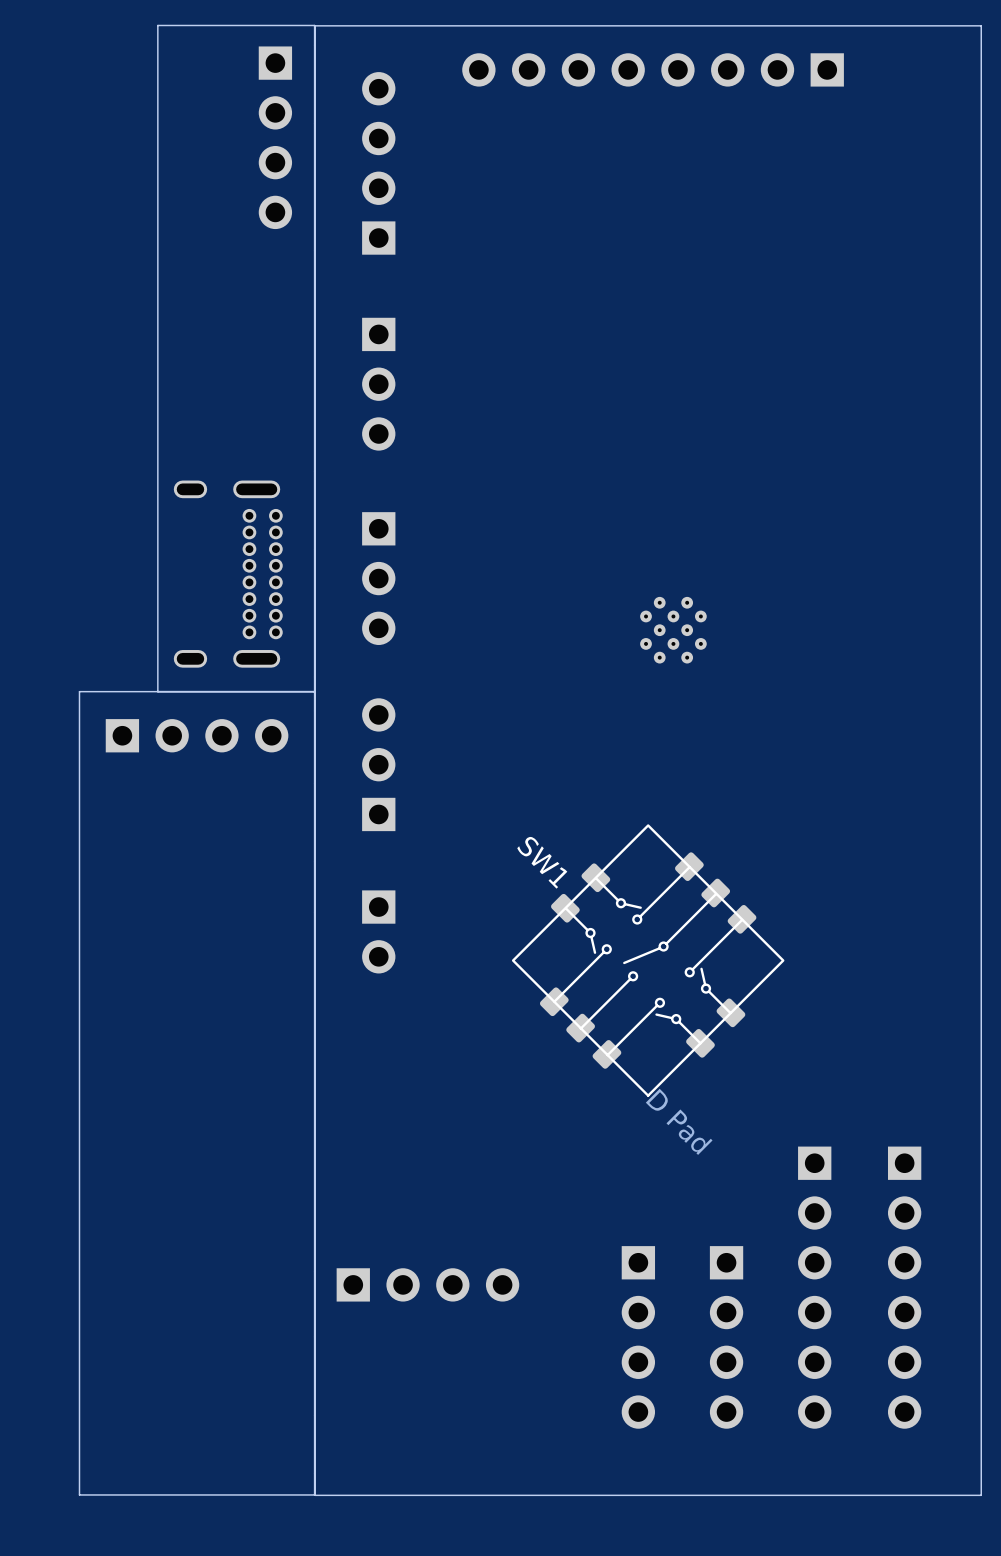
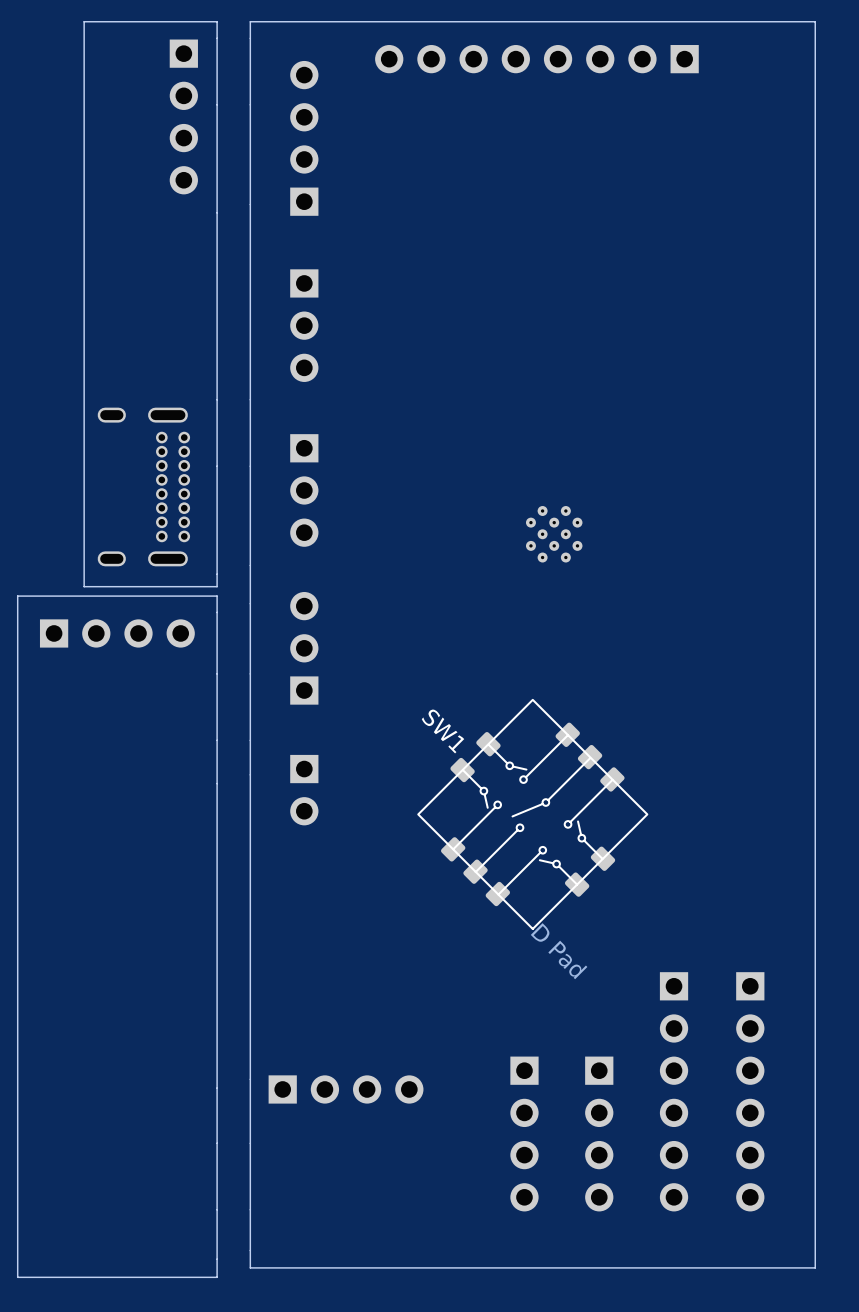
board edge: none -> (217, 21) (217, 586) (84, 586) (84, 21) (217, 21)
board edge: (314, 25) (314, 1494) (79, 1494) (79, 691) (314, 691) -> none
board edge: (314, 25) (157, 25) (157, 691) -> none
part position: (275, 137) -> (183, 116)
part position: (228, 574) -> (143, 486)
board edge: none -> (217, 596) (217, 1277) (17, 1277) (17, 596) (217, 596)
part position: (197, 735) -> (117, 633)

